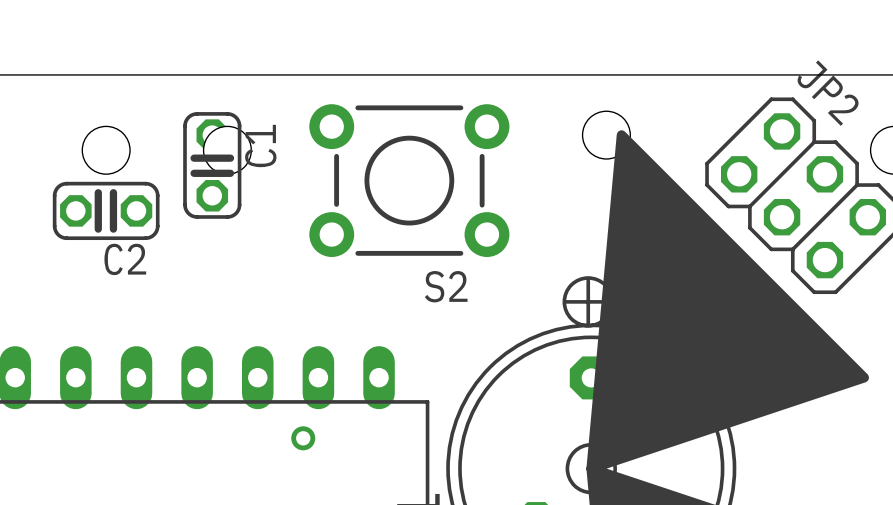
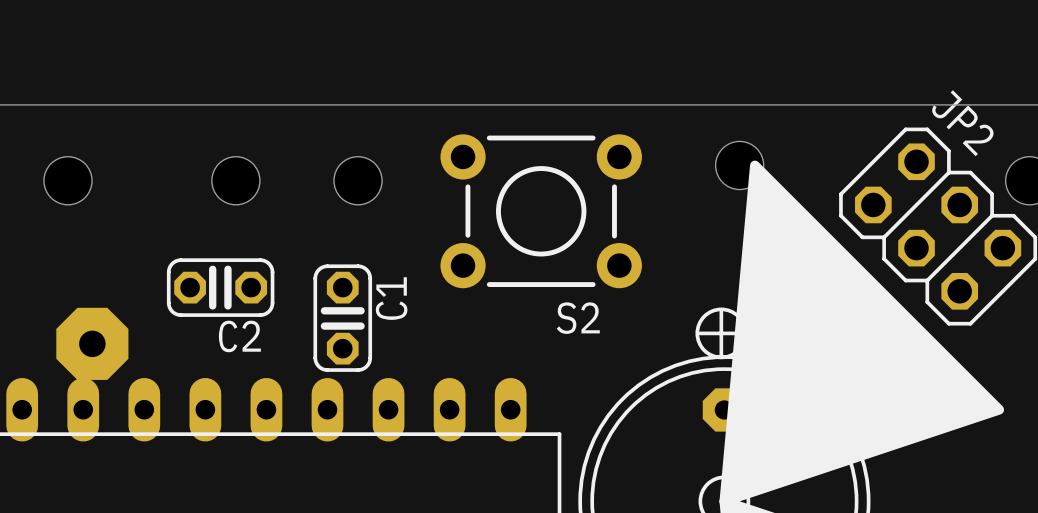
C1 position: (212, 165) -> (342, 318)
C2 position: (106, 210) -> (220, 287)
via: (303, 438) -> none

